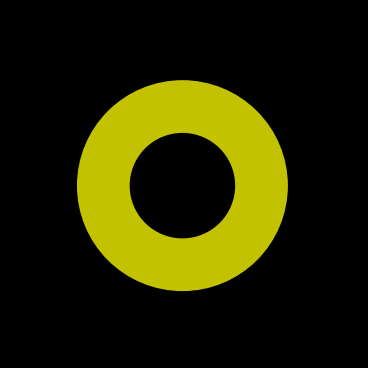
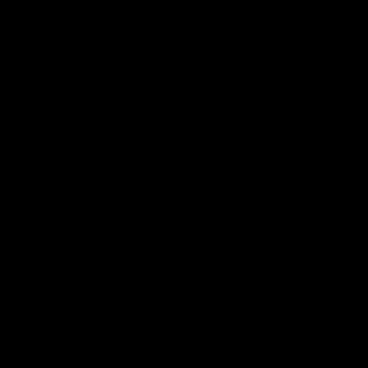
part: (182, 185) -> none

